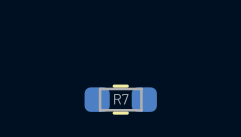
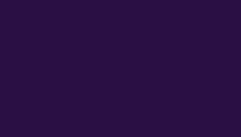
R7: (120, 99) -> none

